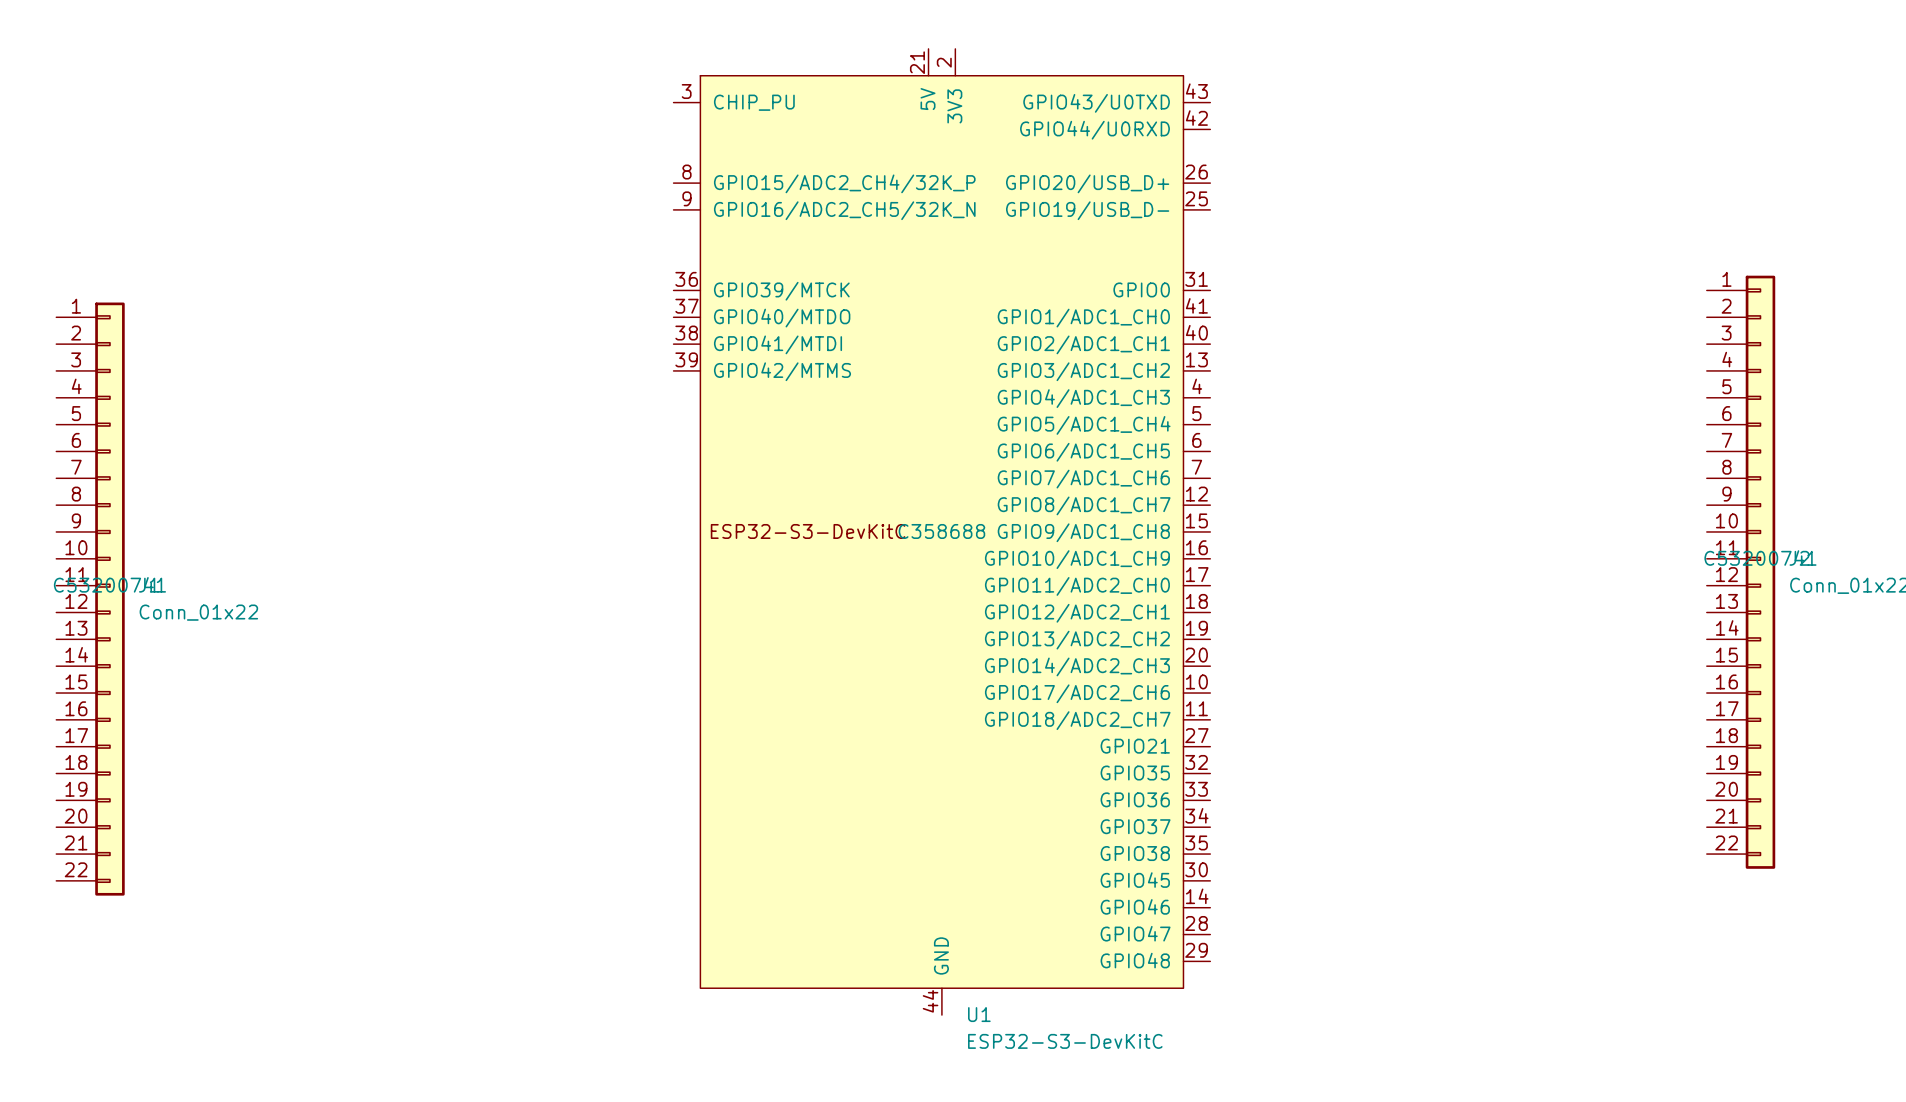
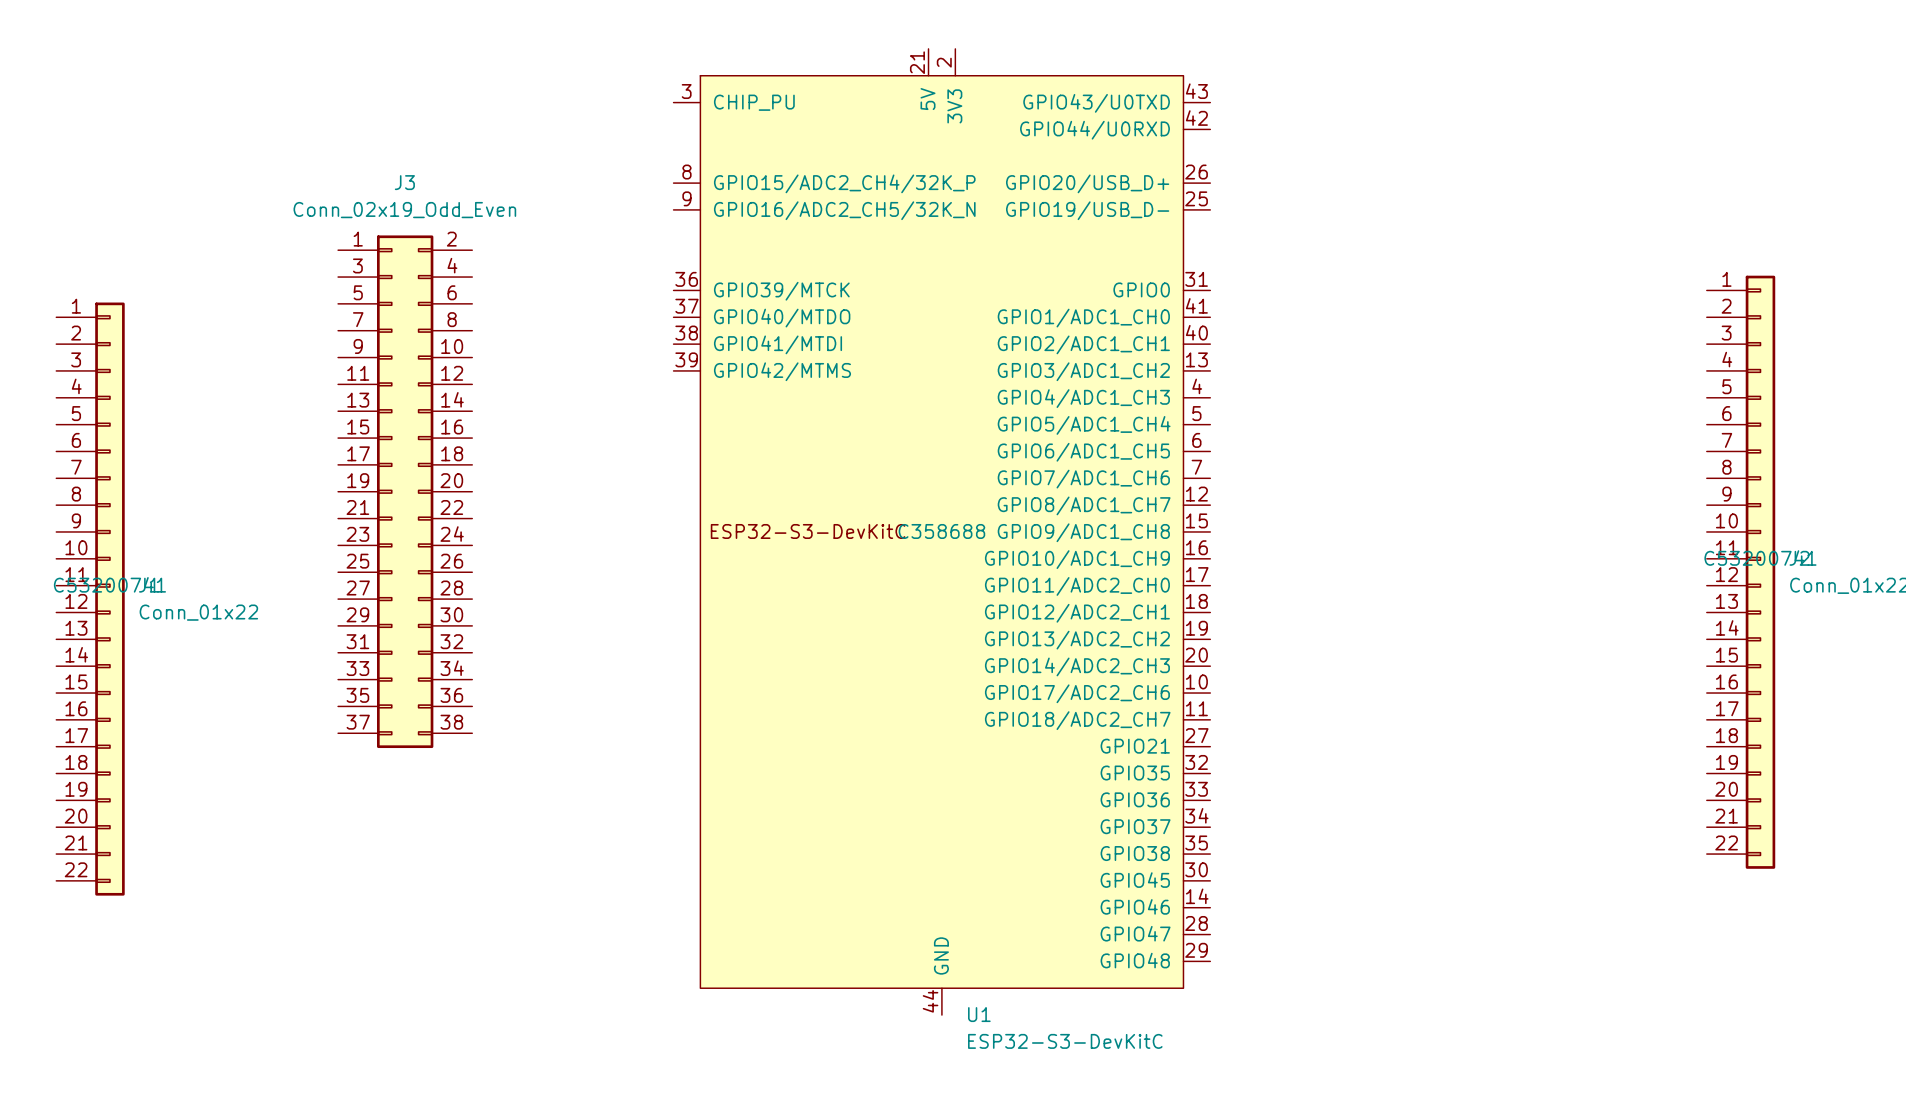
J3: none -> Conn_02x19_Odd_Even (405, 491)

